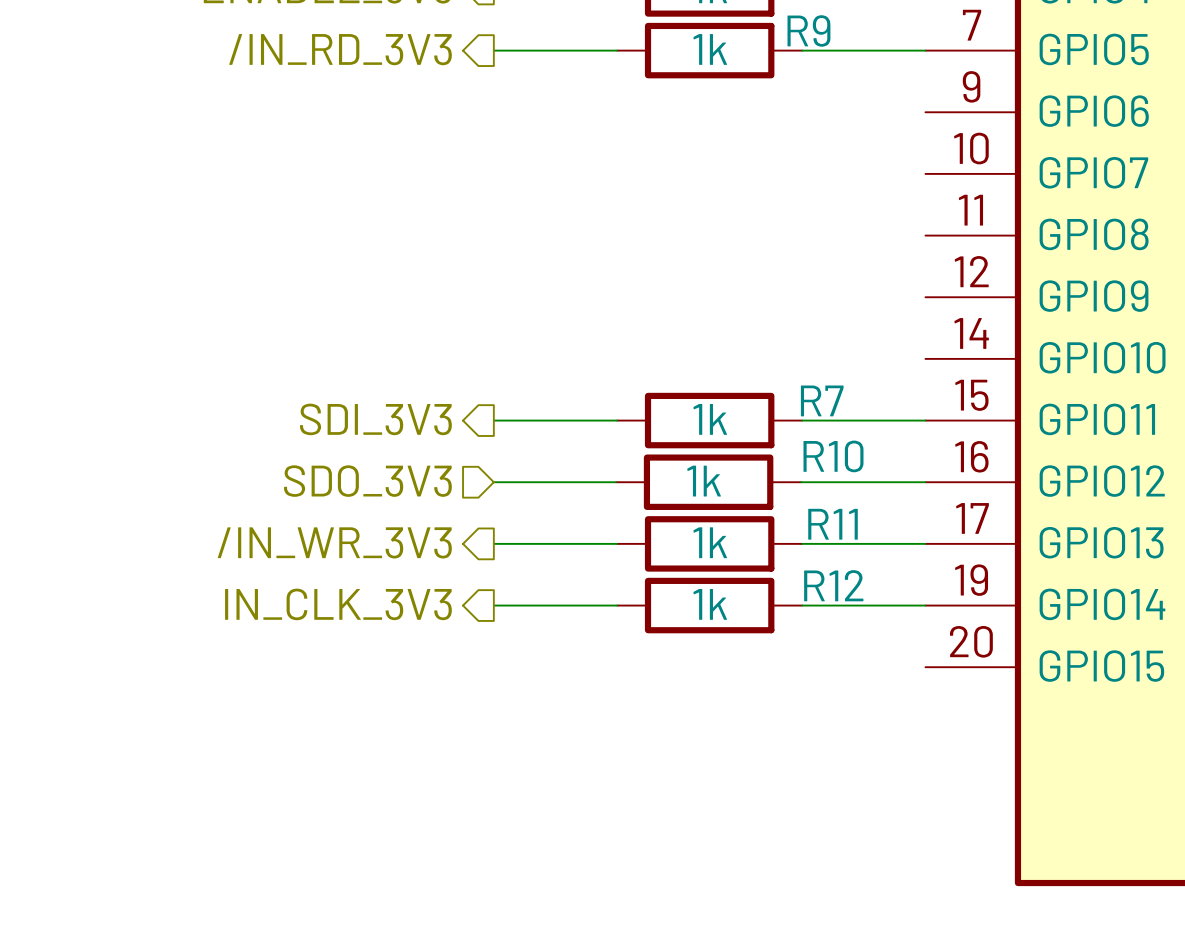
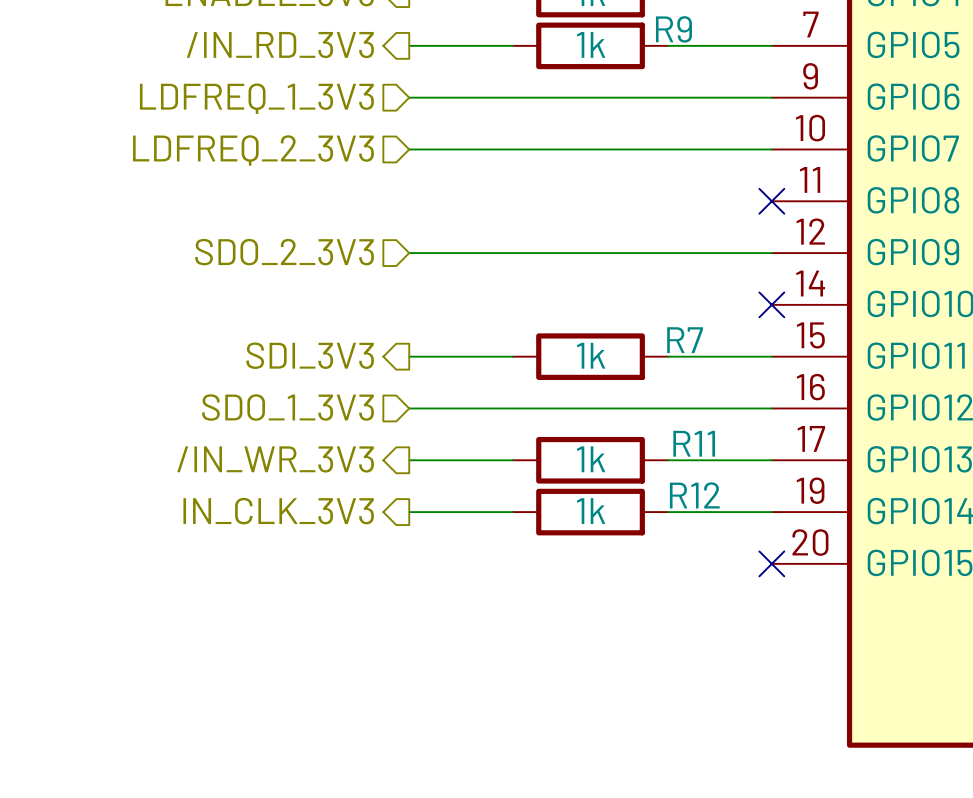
wire: none -> (409, 97) (771, 97)
hierarchical label: none -> LDFREQ_1_3V3 (256, 98)
wire: none -> (409, 149) (771, 149)
hierarchical label: none -> LDFREQ_2_3V3 (253, 150)
no-connect mark: none -> (771, 201)
hierarchical label: none -> SDO_2_3V3 (284, 252)
wire: none -> (409, 253) (771, 253)
no-connect mark: none -> (771, 304)
hierarchical label: SDO_3V3 (367, 481) -> SDO_1_3V3 (288, 407)
wire: none -> (512, 408) (667, 408)
R10: 1k (708, 482) -> none
no-connect mark: none -> (771, 563)

